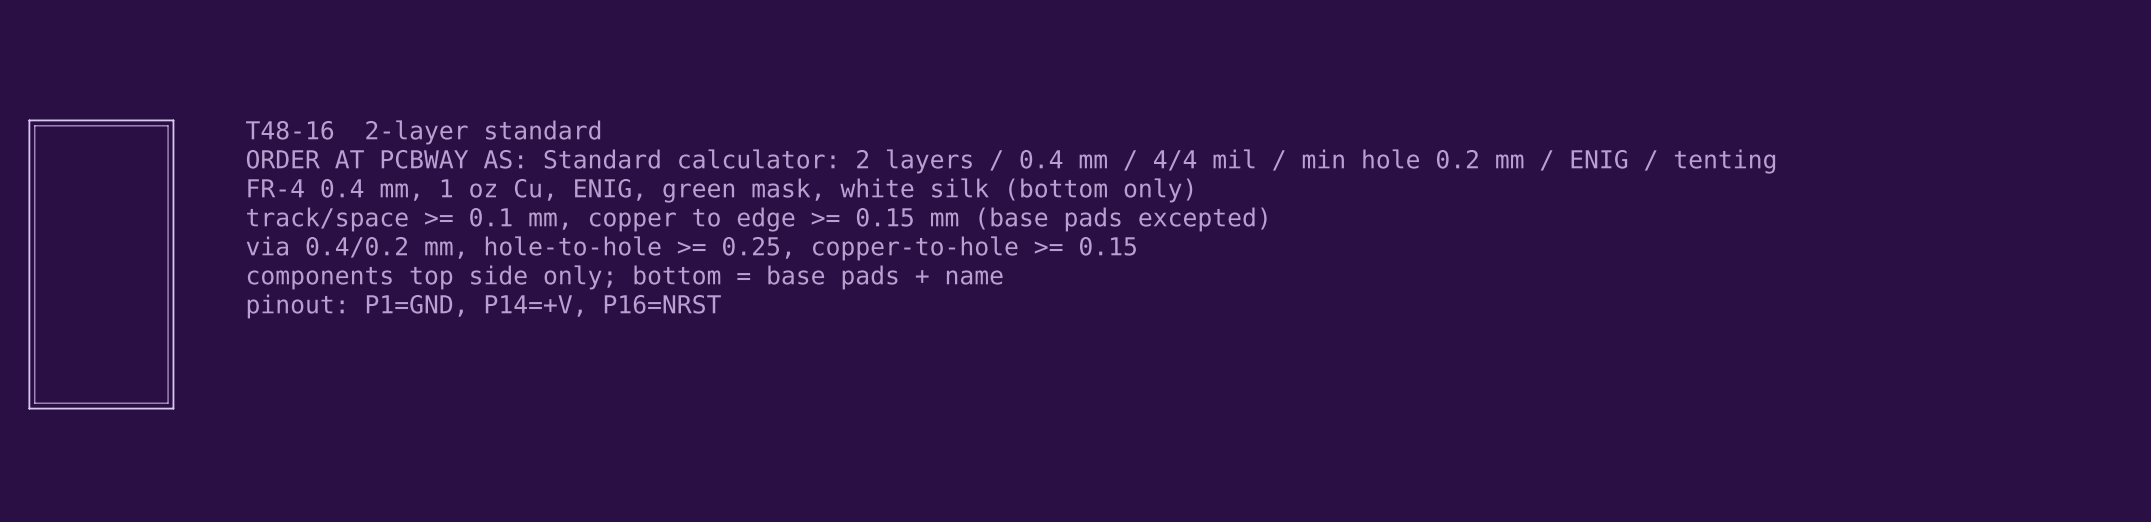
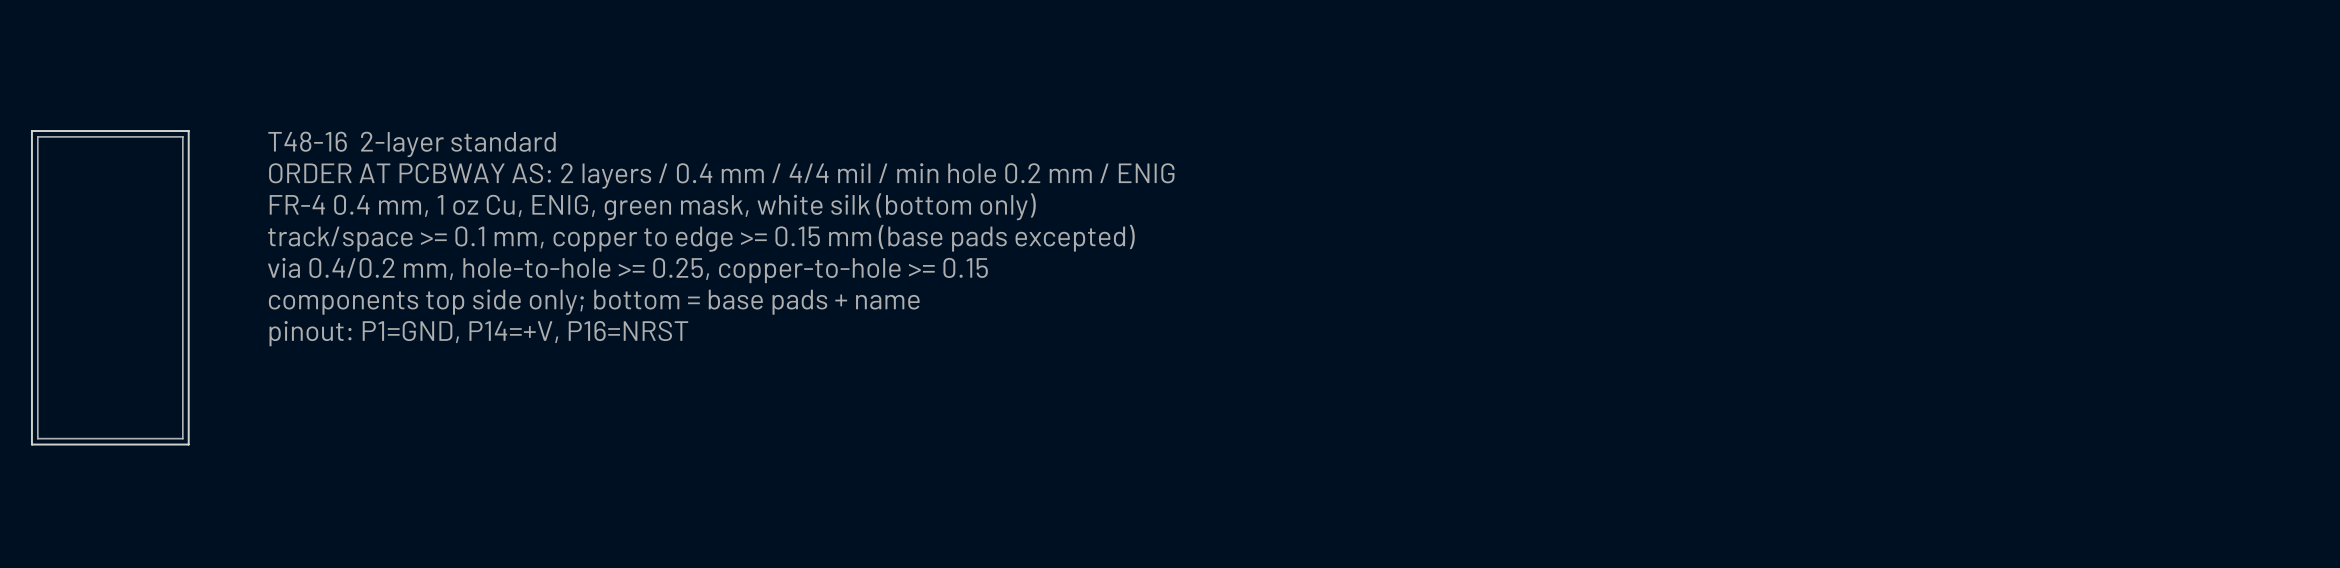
text: ORDER AT PCBWAY AS: Standard calculator: 2 layers / 0.4 mm / 4/4 mil / min hole 0.2 mm / ENIG / tenting (1011, 161) -> ORDER AT PCBWAY AS: 2 layers / 0.4 mm / 4/4 mil / min hole 0.2 mm / ENIG (721, 175)

